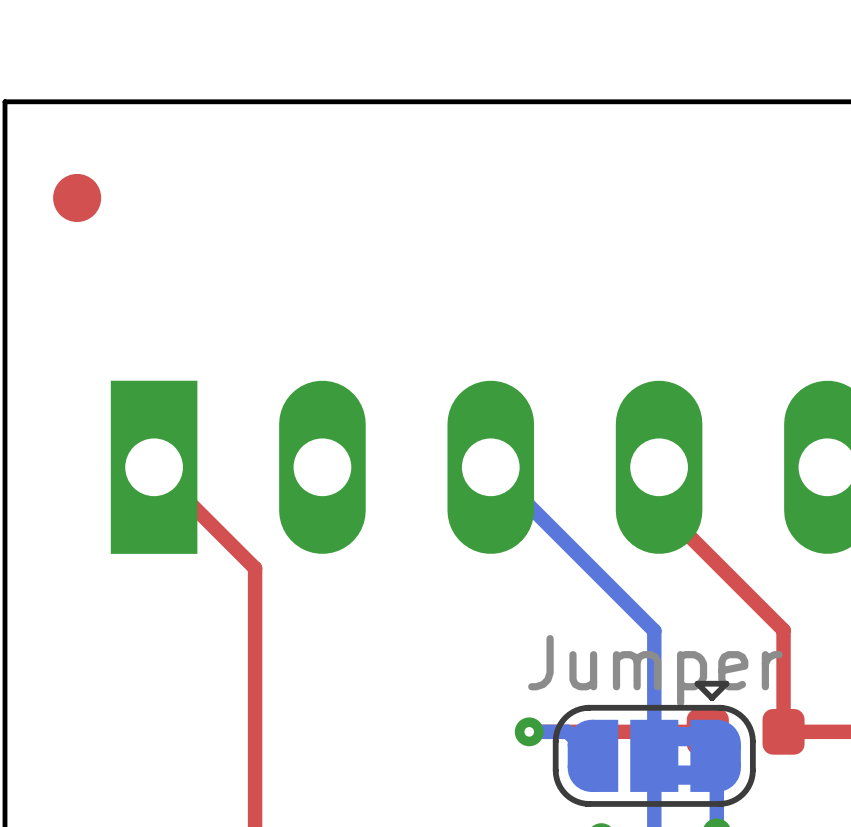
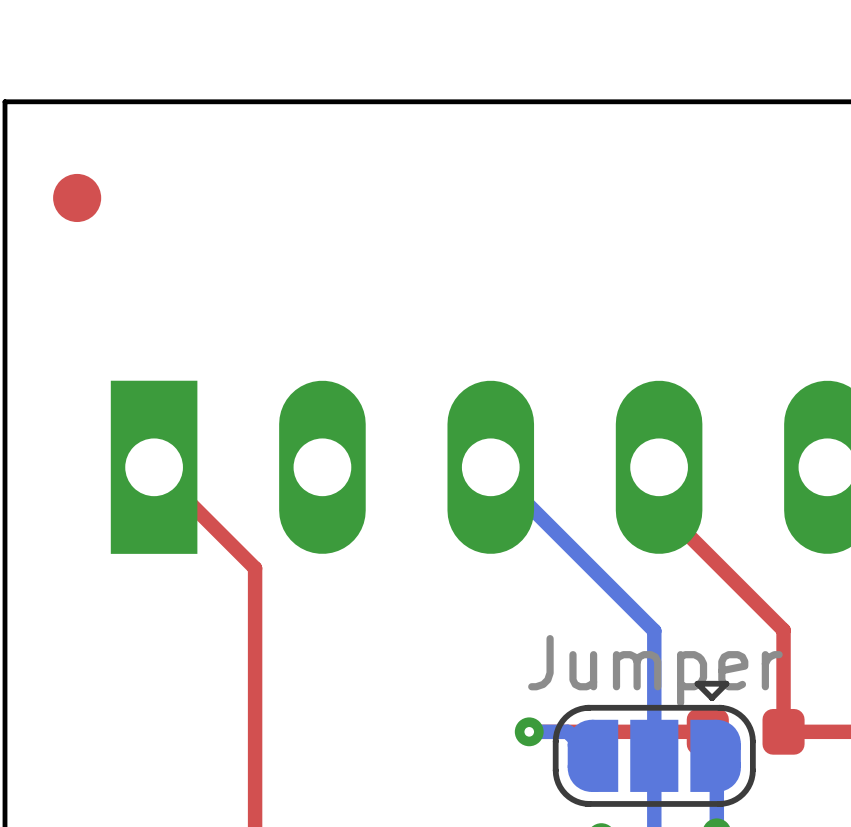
part footprint: [552, 680, 756, 807] -> [552, 680, 756, 807]

